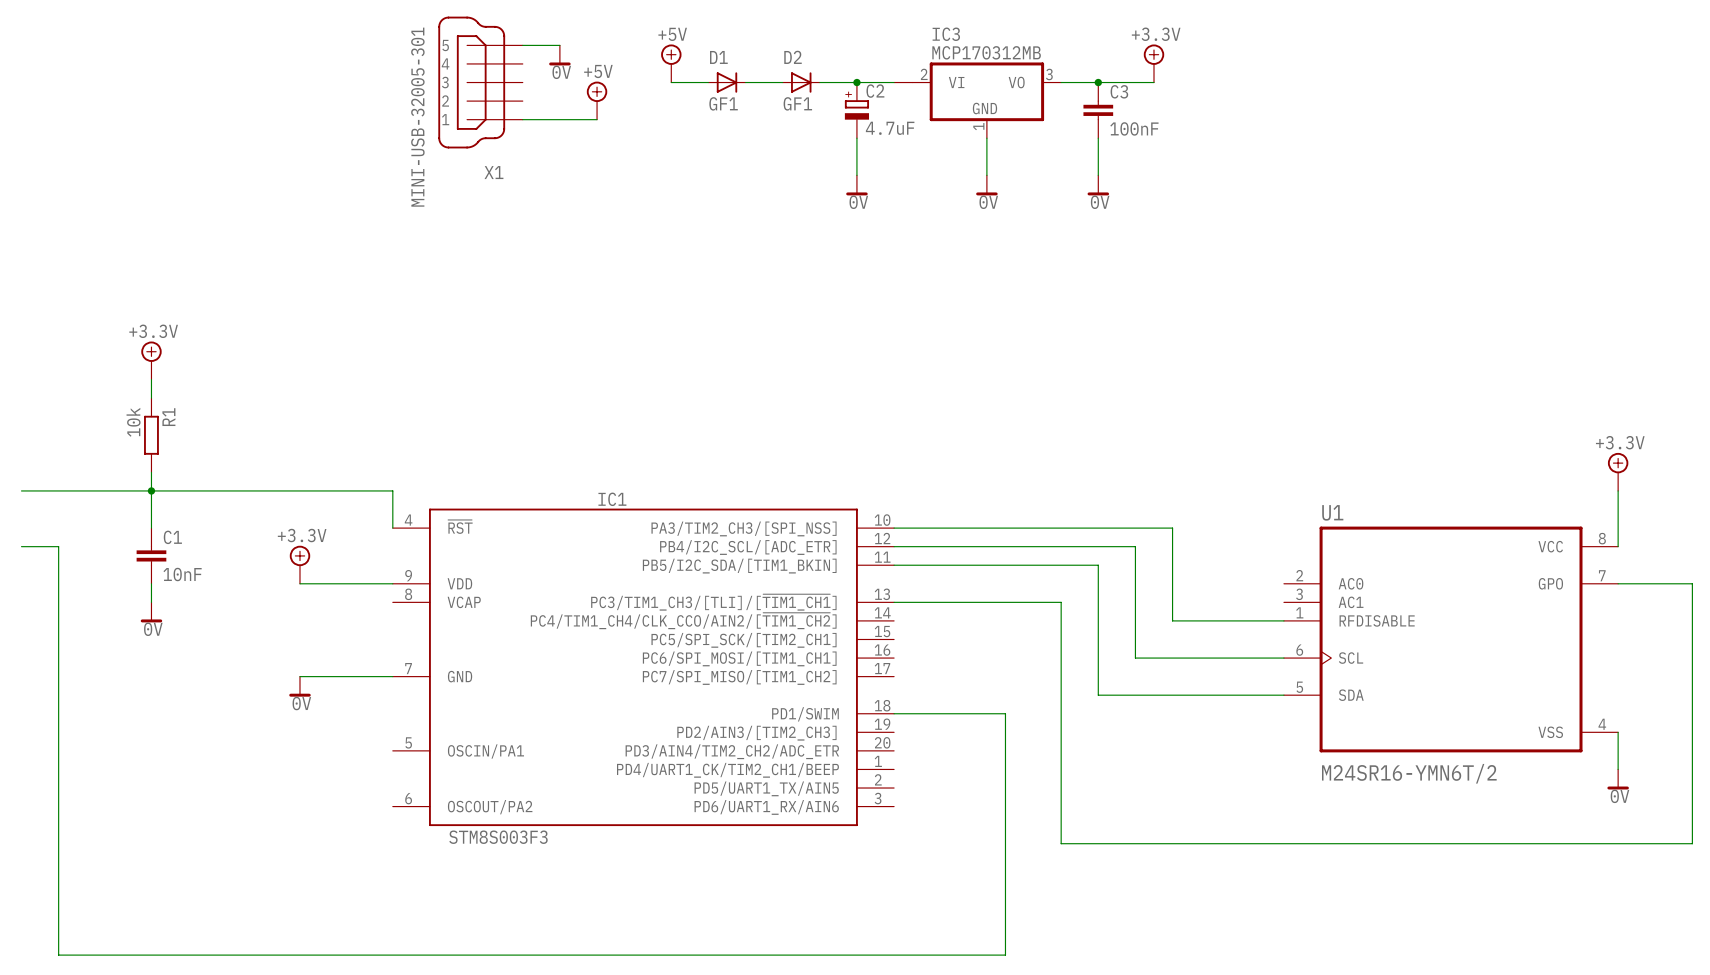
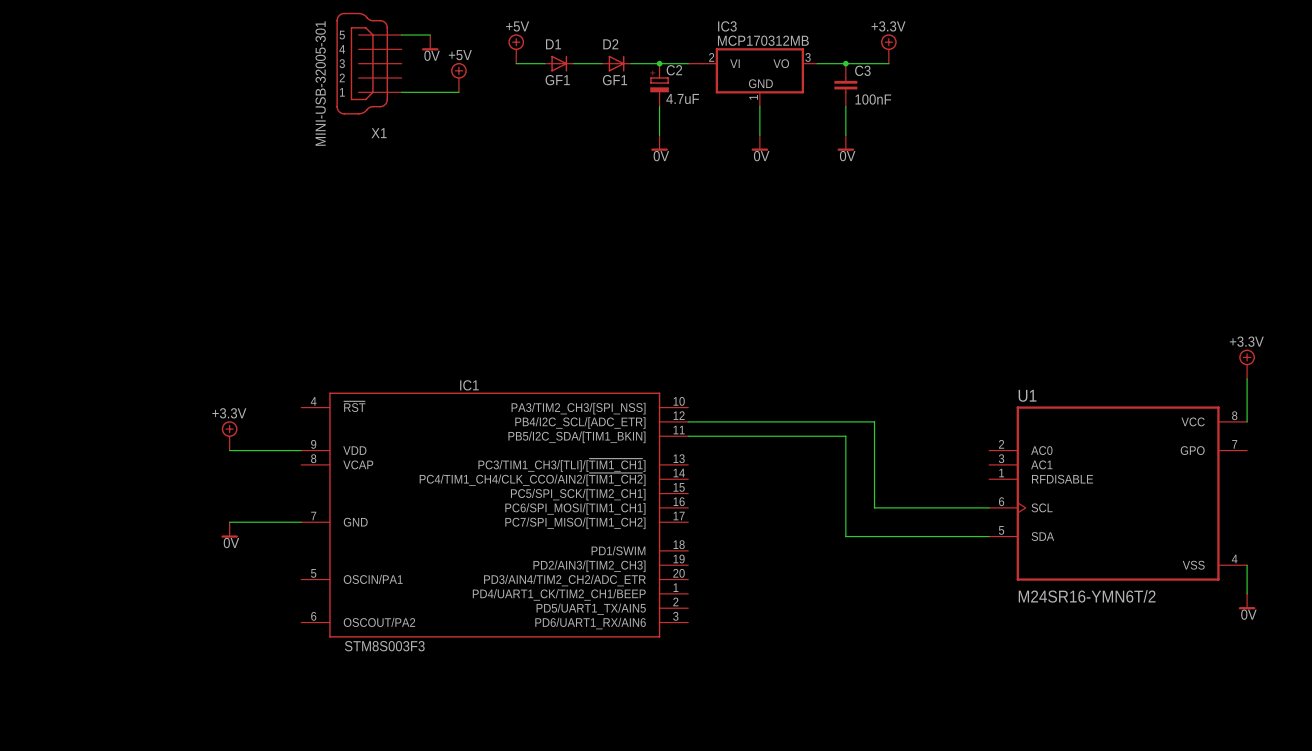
power symbol: +3.3V (151, 360) -> none
wire: (151, 379) (151, 398) -> none
R1: 10k (151, 435) -> none
wire: (151, 472) (151, 528) -> none
wire: (21, 490) (392, 490) (392, 528) -> none
junction: (151, 490) -> none
wire: (894, 528) (1172, 528) (1172, 620) (1283, 620) -> none
wire: (21, 546) (58, 546) (58, 955) (1005, 955) (1005, 713) (894, 713) -> none
C1: 10nF (151, 555) -> none
wire: (151, 583) (151, 602) -> none
wire: (1618, 583) (1692, 583) (1692, 843) (1061, 843) (1061, 602) (894, 602) -> none
power symbol: 0V (151, 612) -> none

